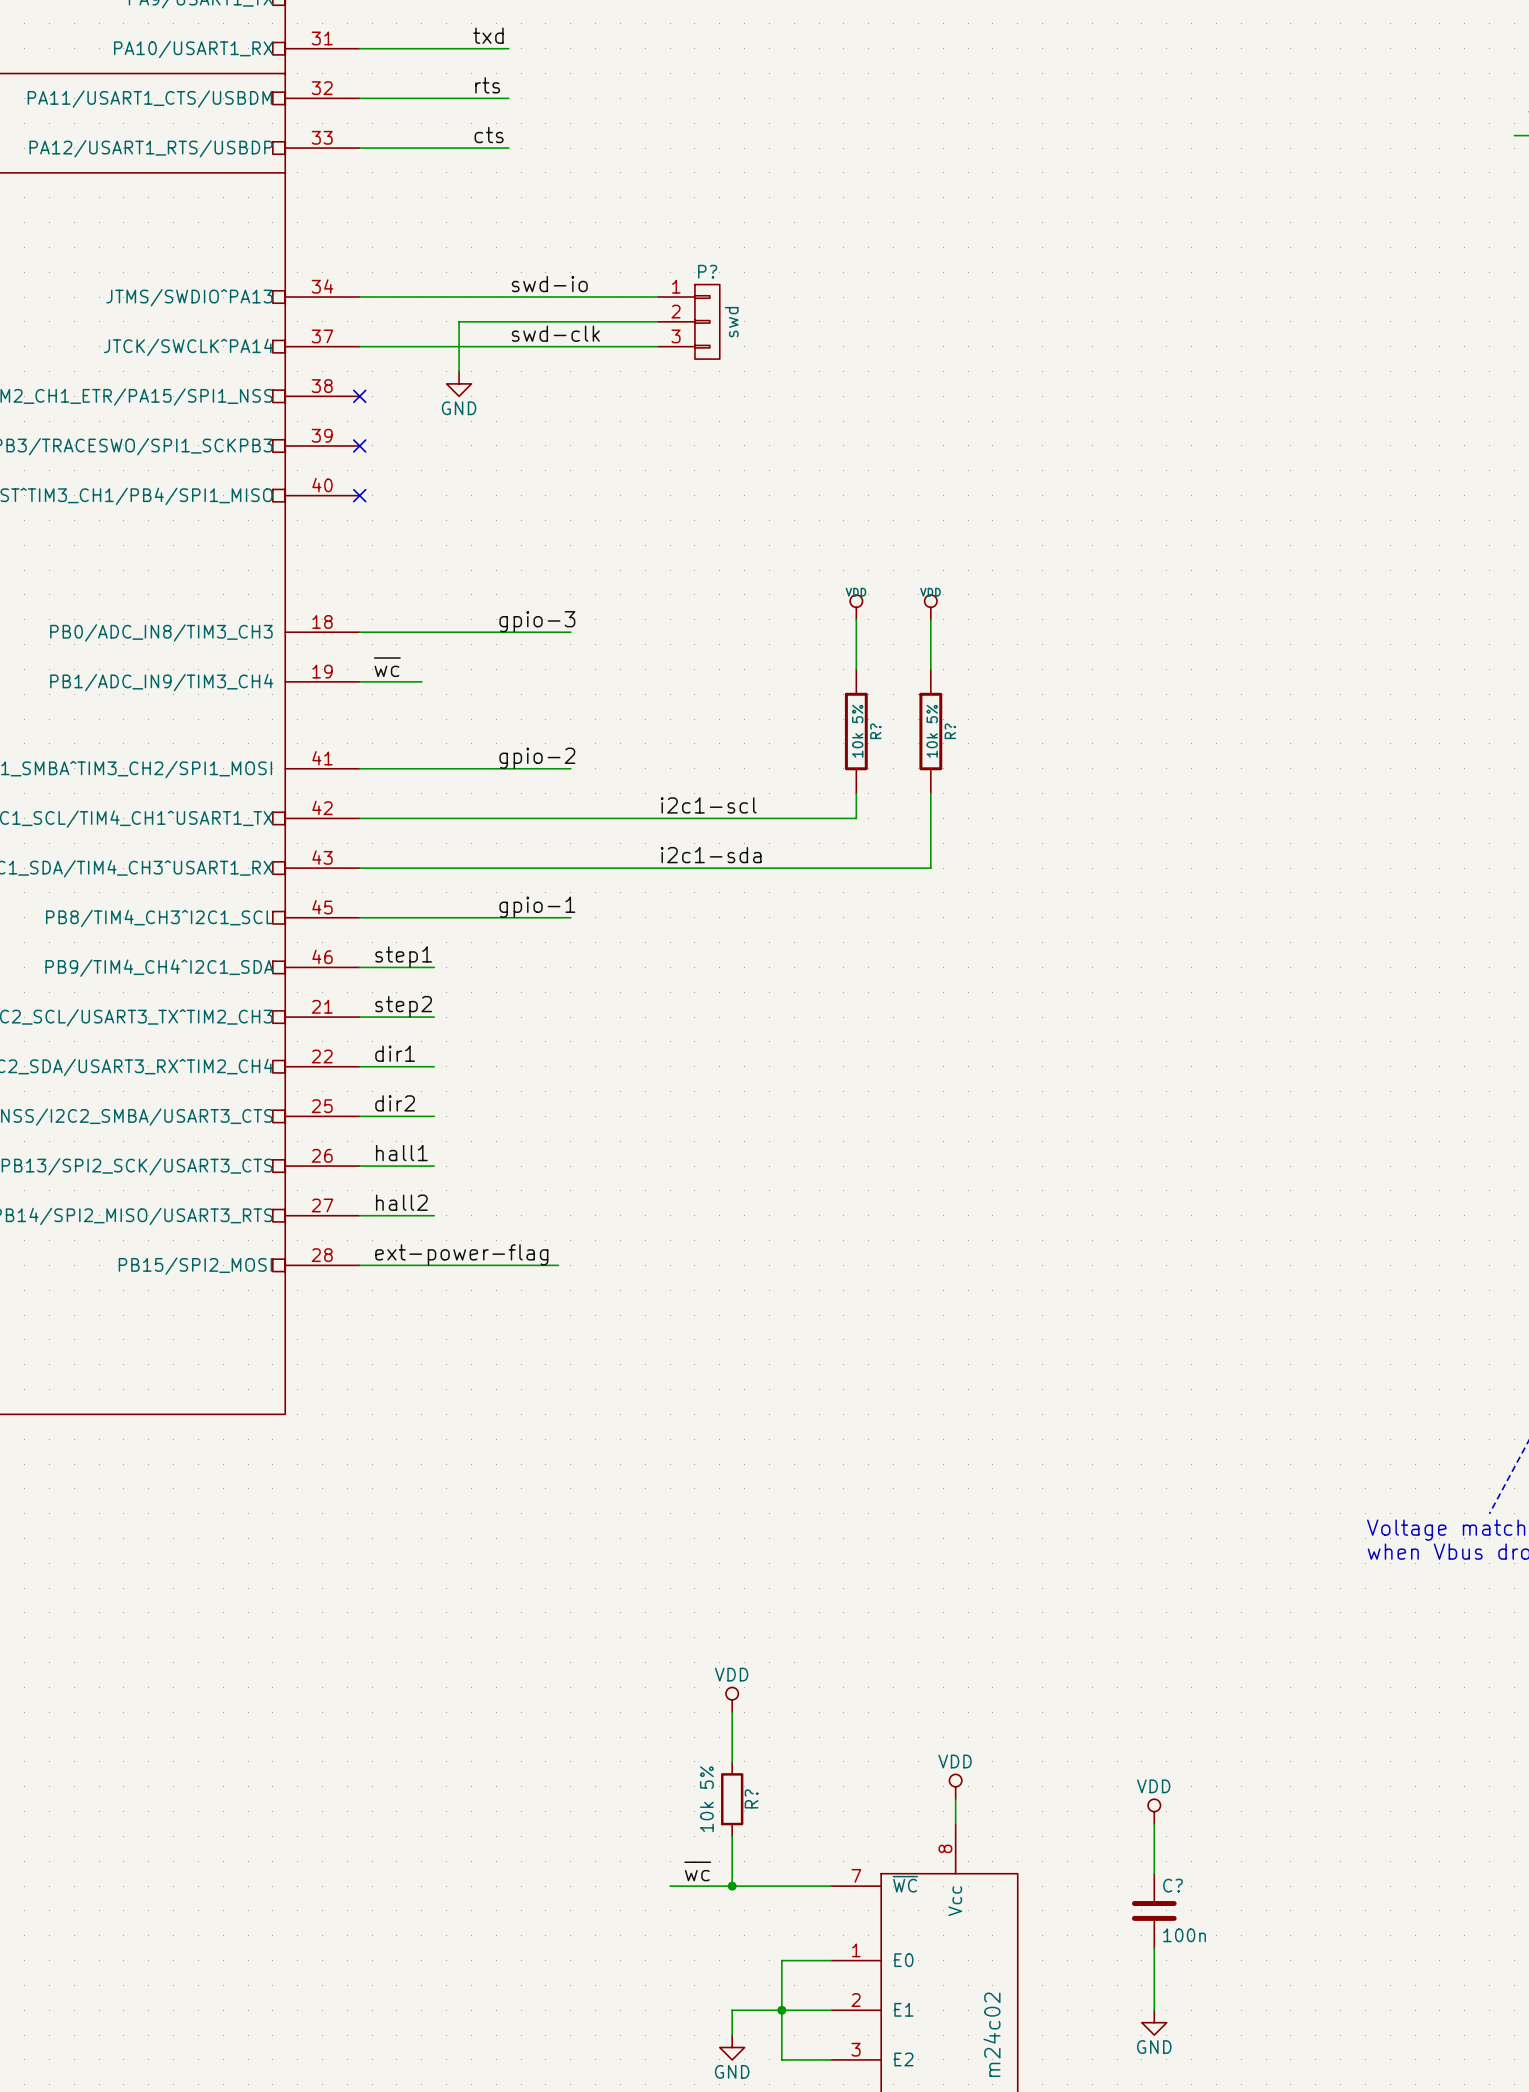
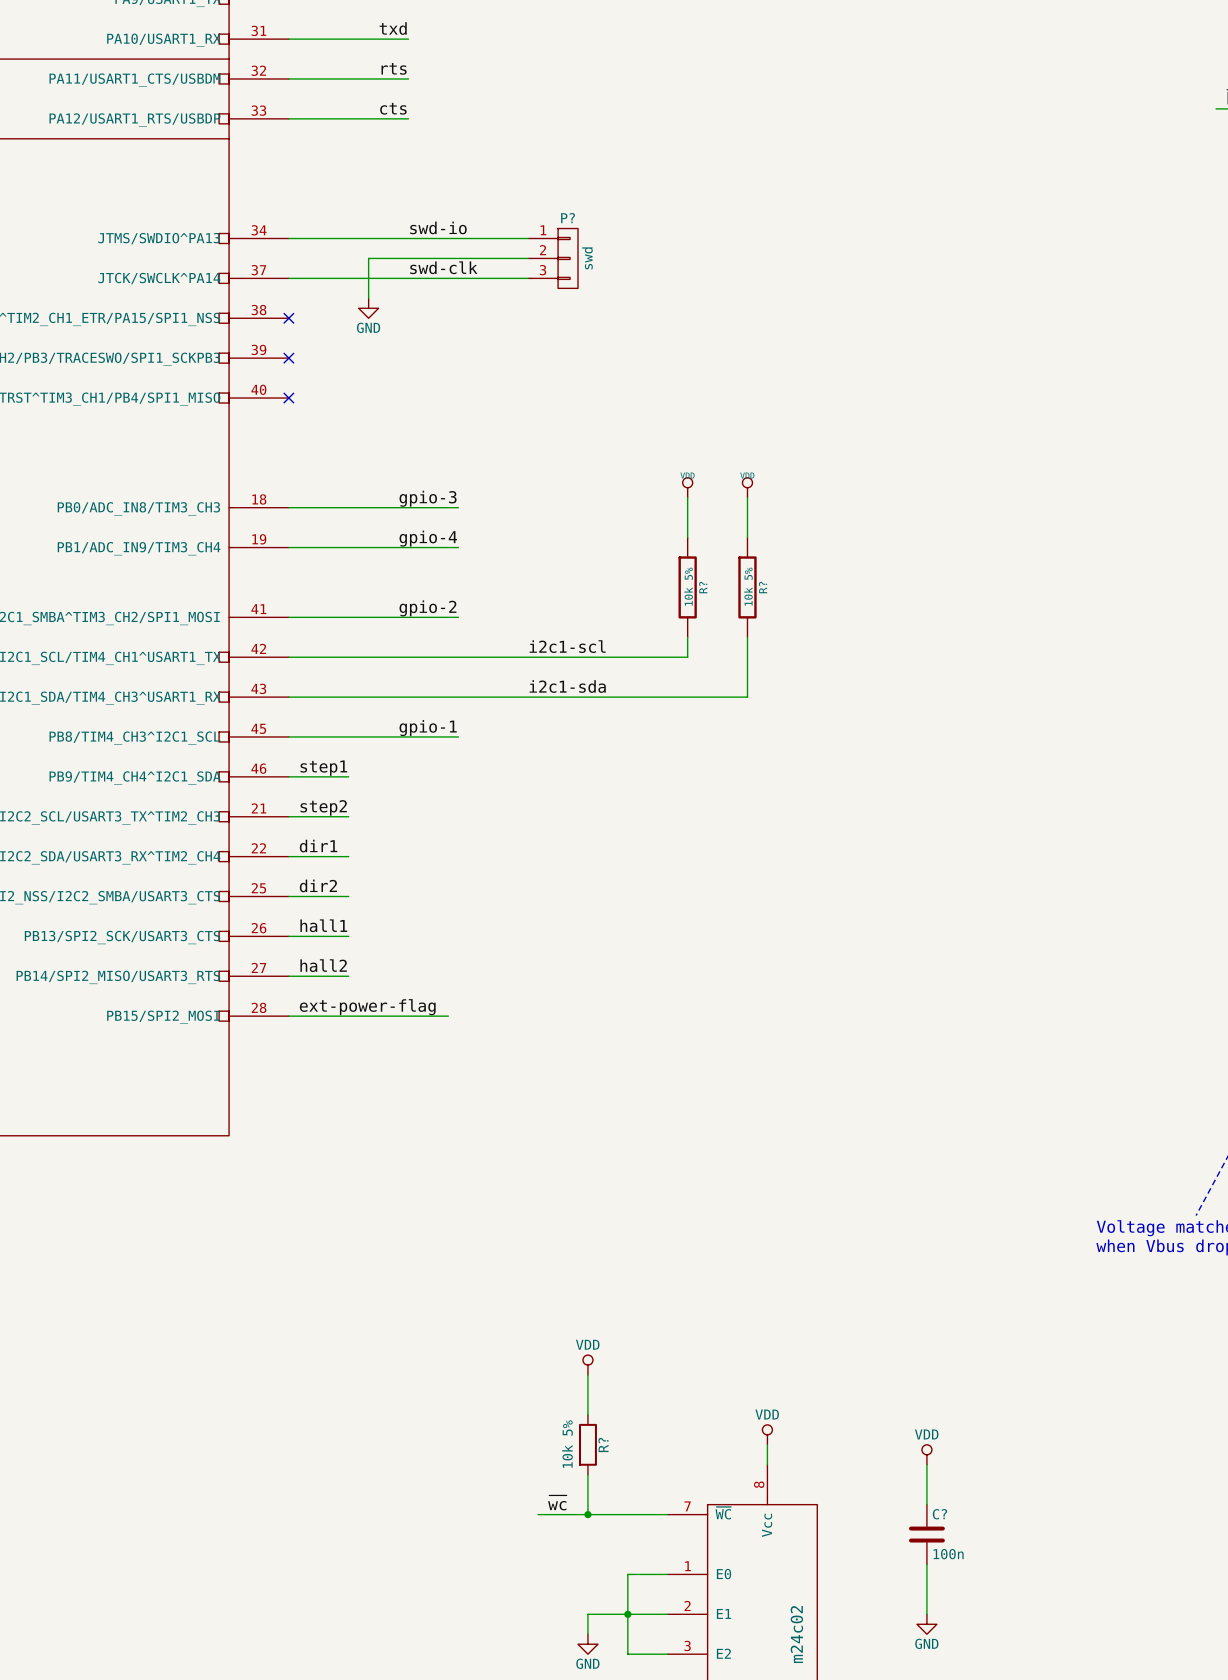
label: ~{wc} (387, 667) -> none
label: none -> gpio-4 (428, 538)
wire: none -> (338, 547) (458, 547)

